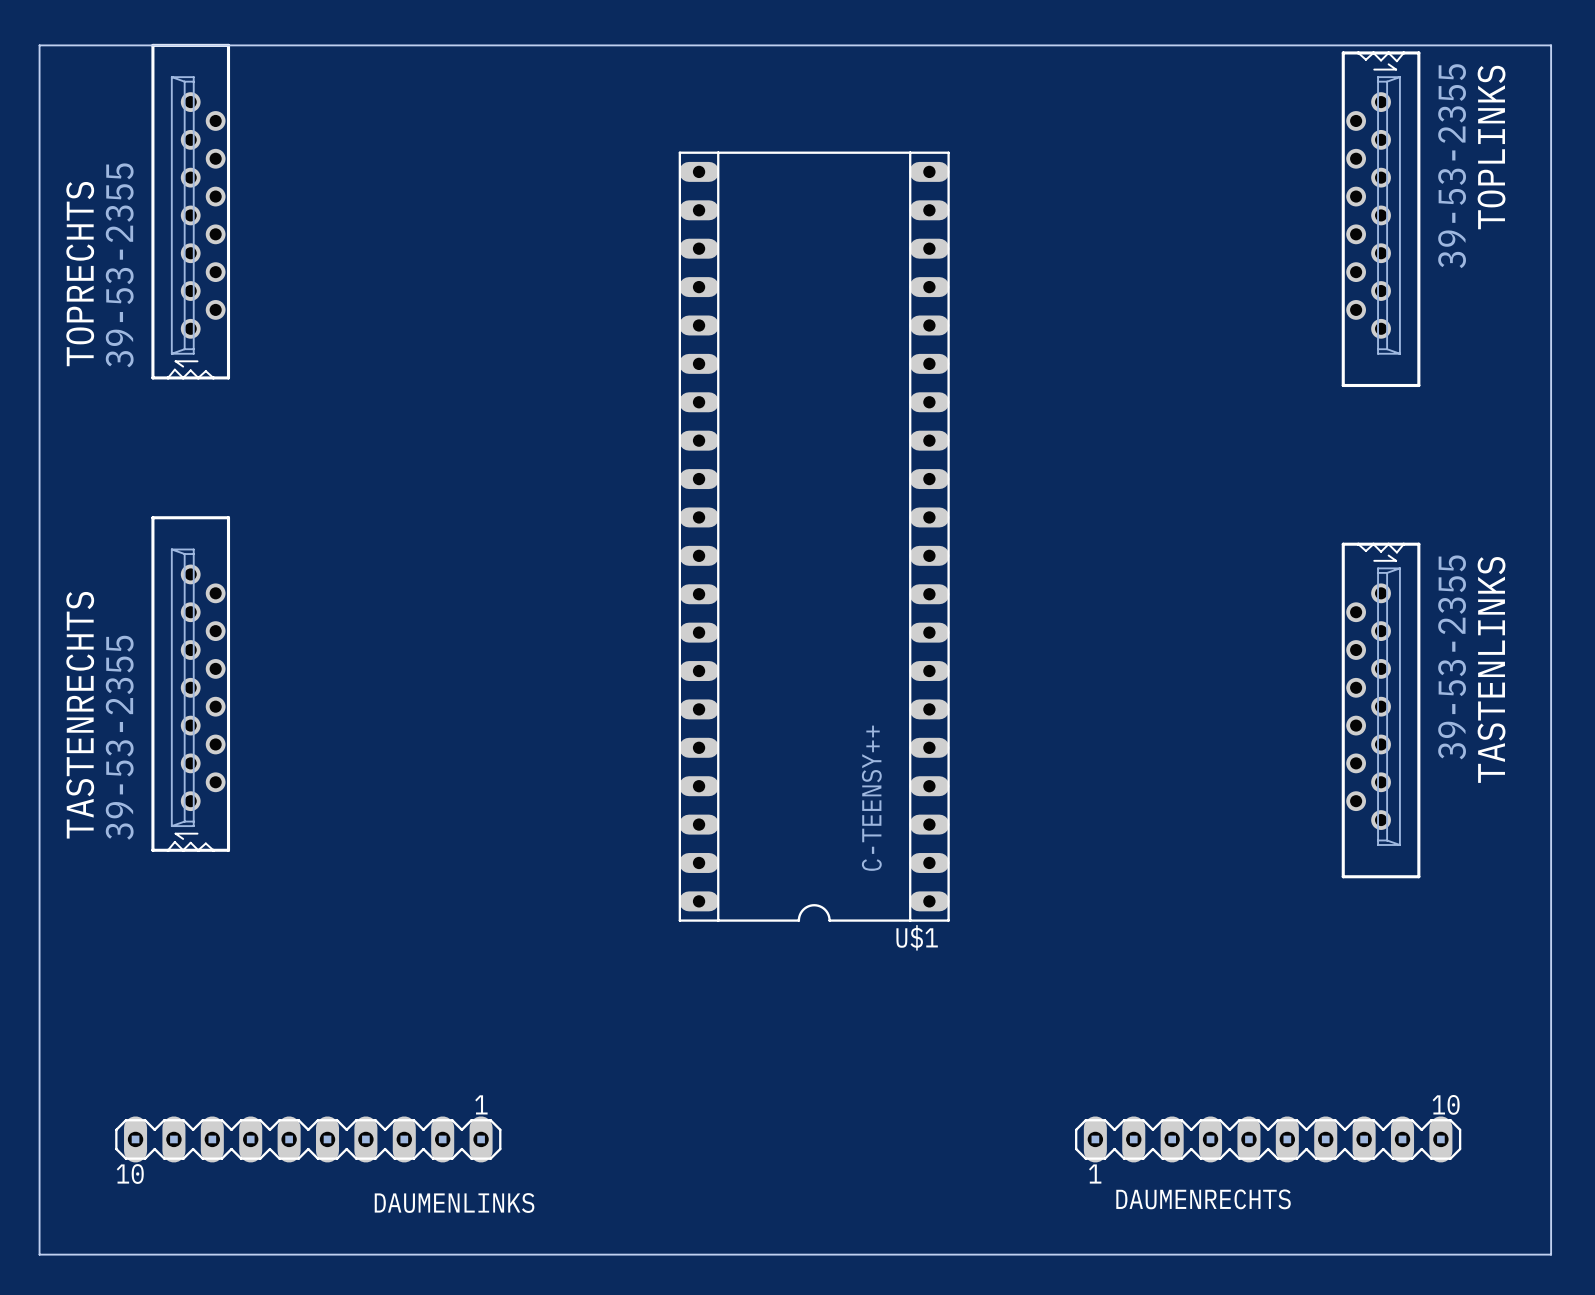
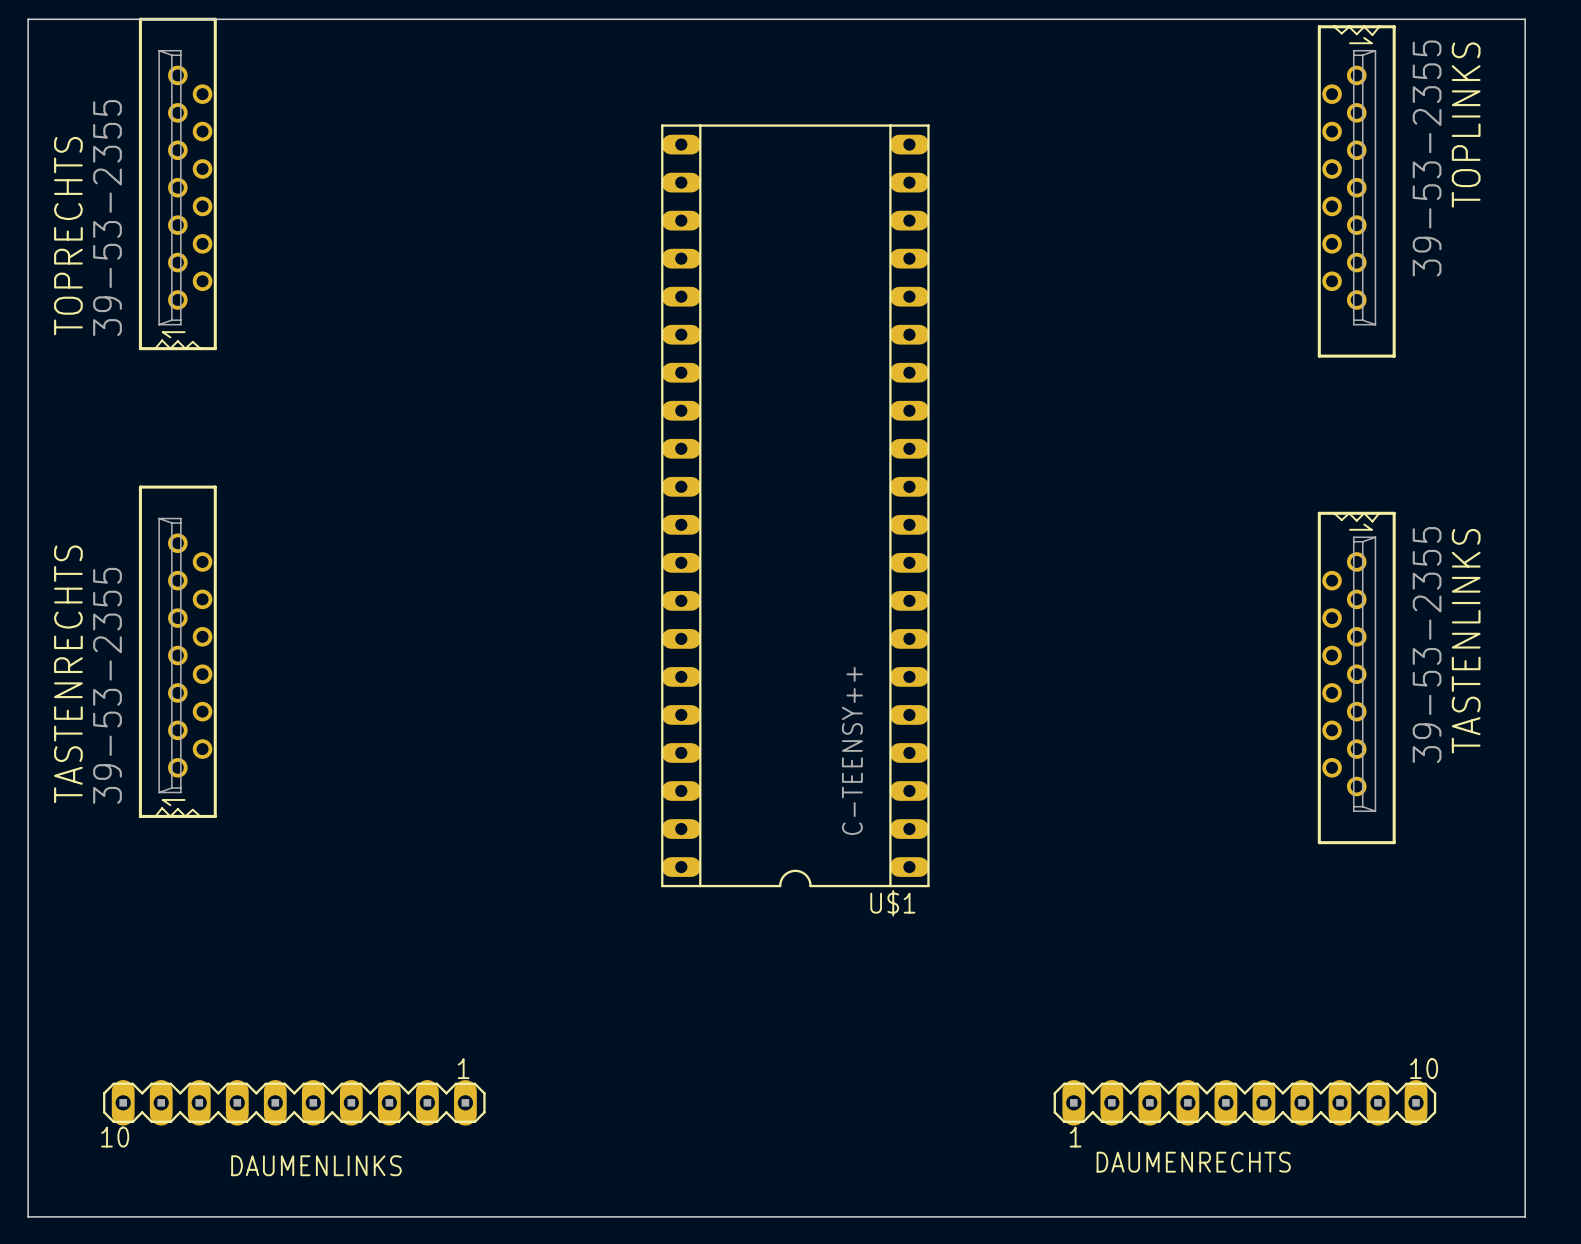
DAUMENLINKS name position: DAUMENLINKS (454, 1202) -> DAUMENLINKS (316, 1165)

